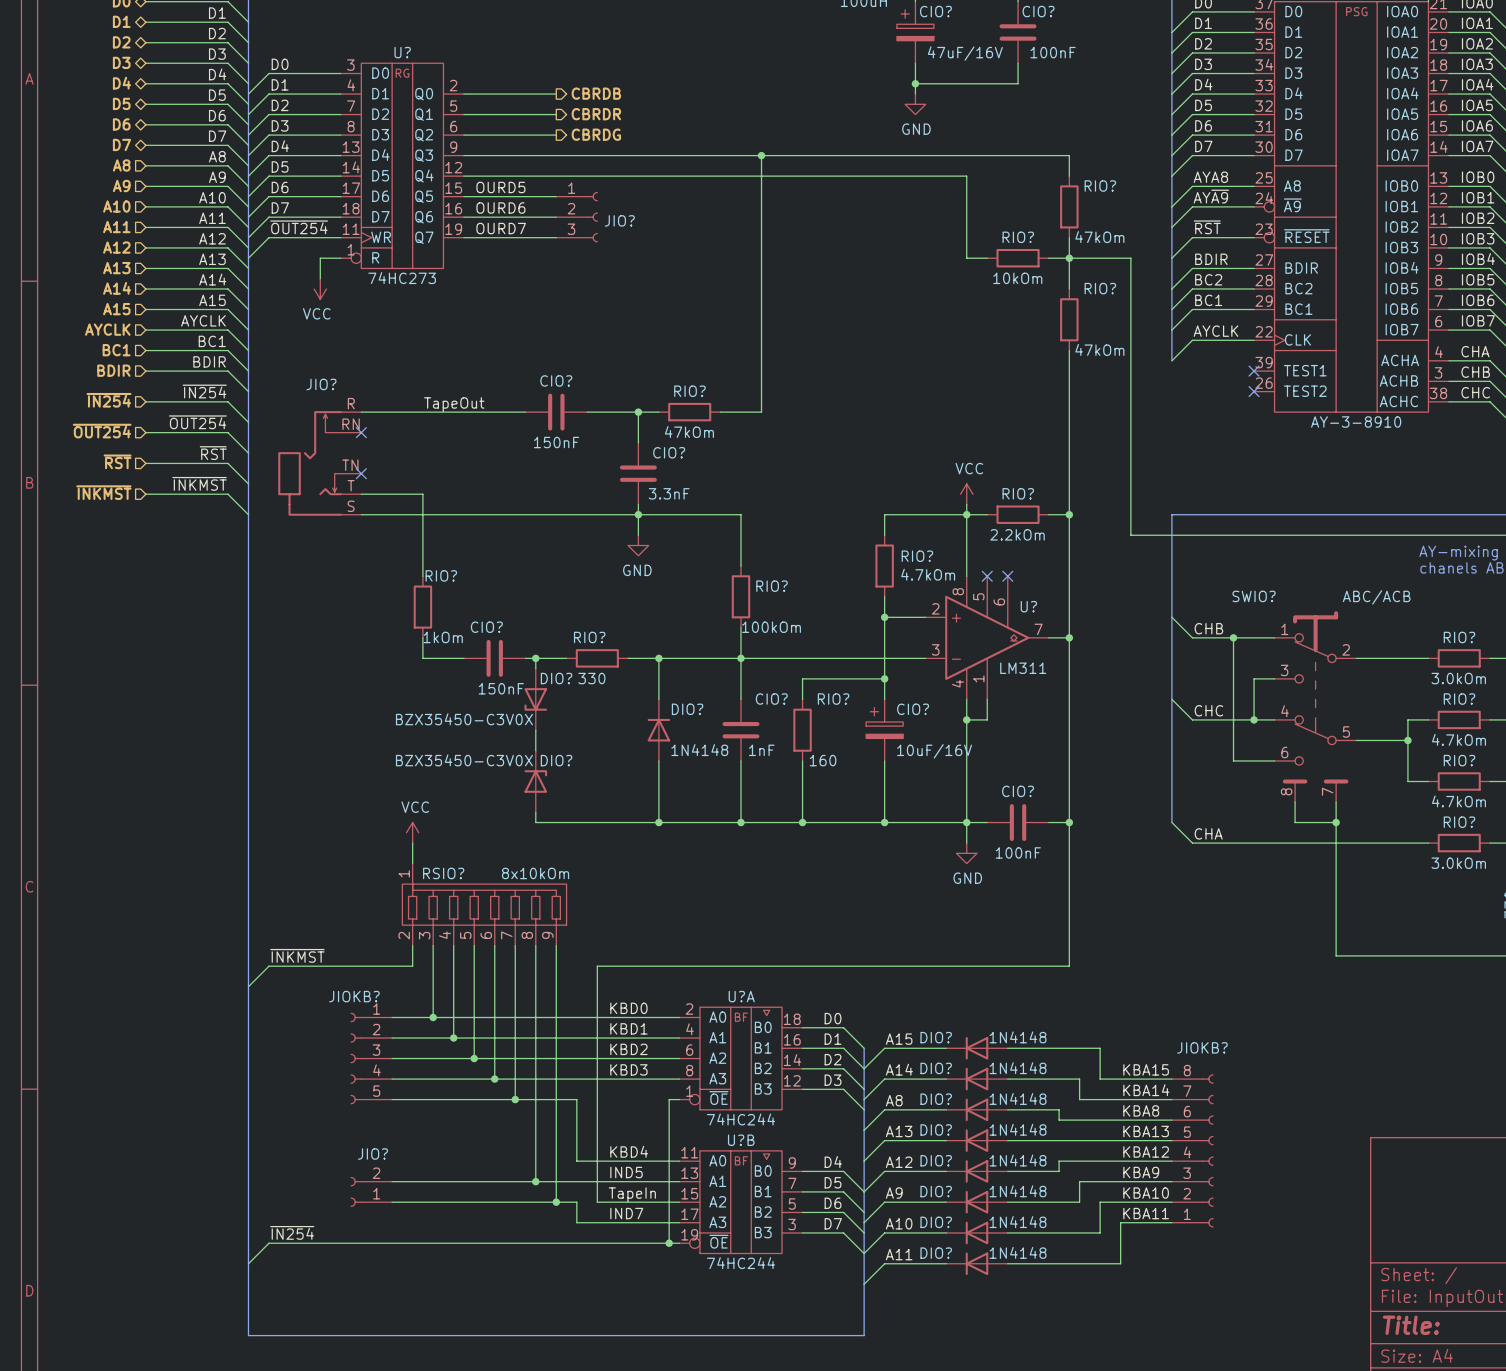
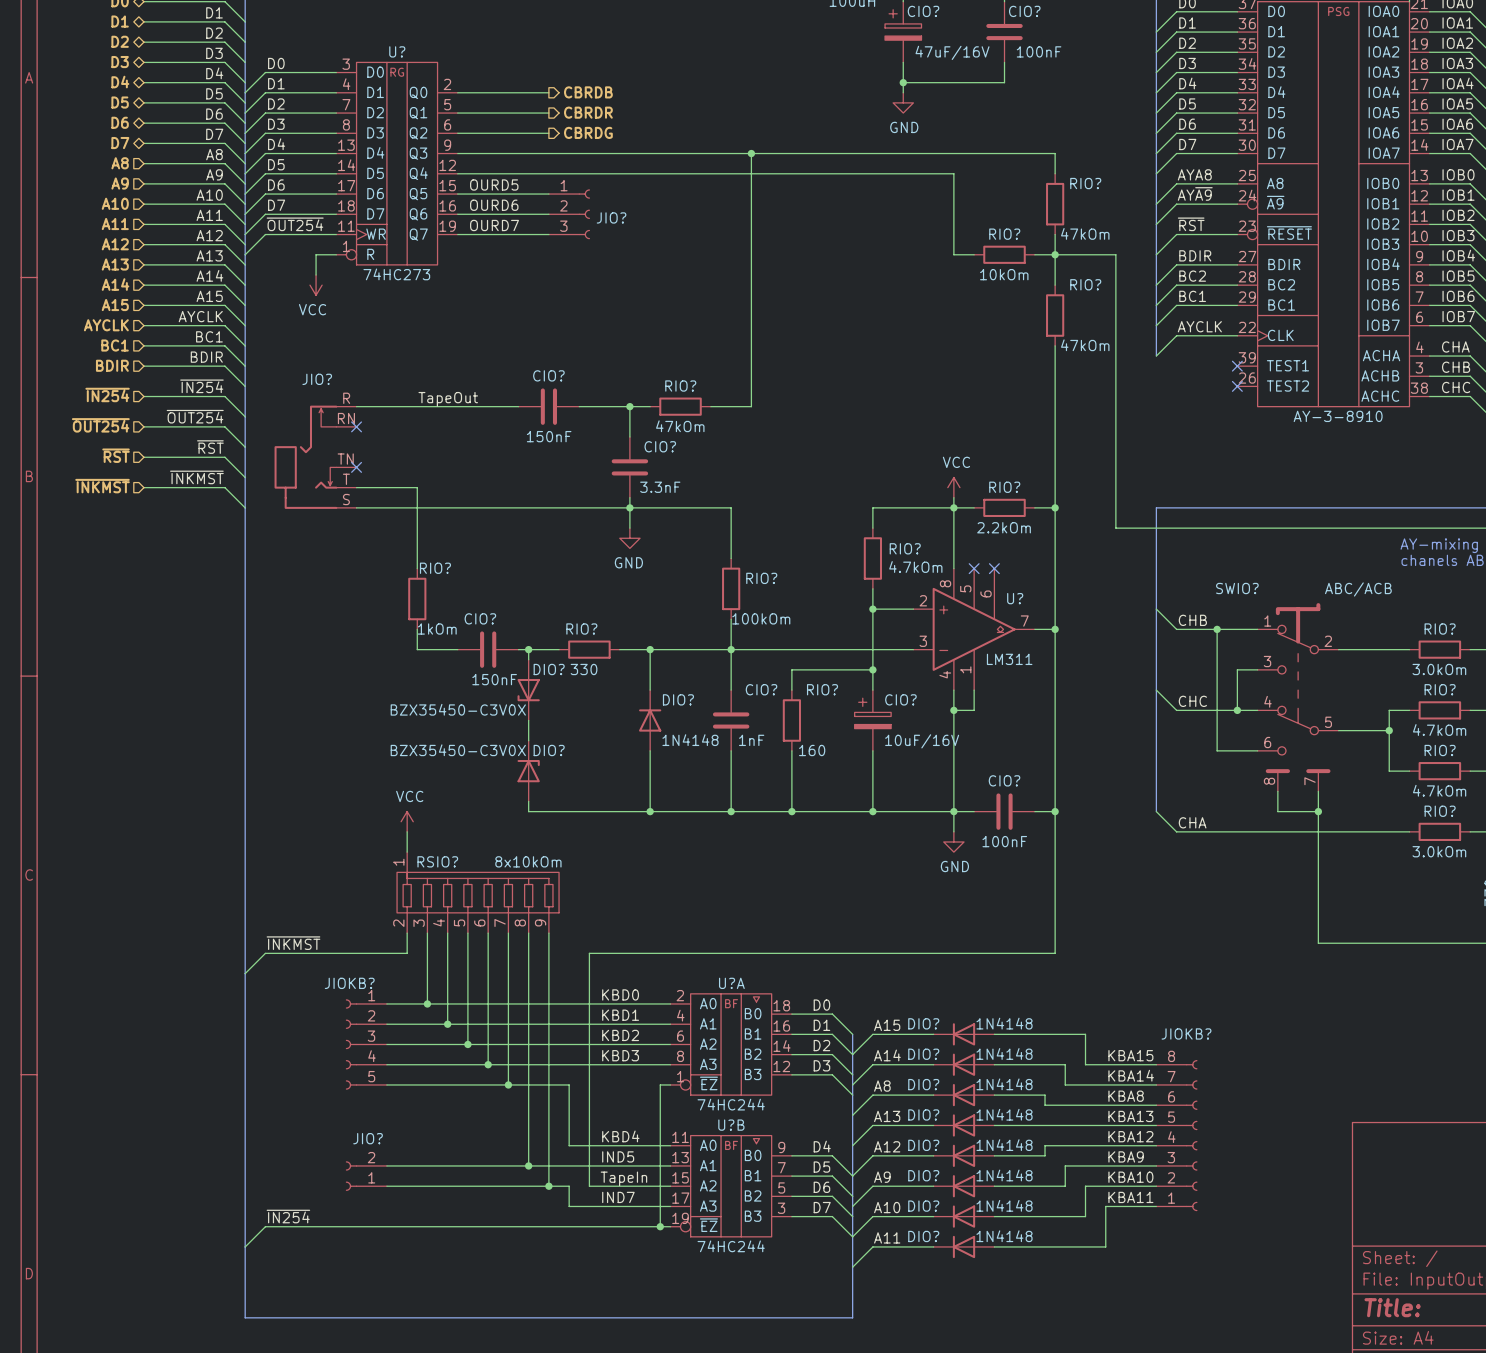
U?A pin name: ~{OE} (718, 1098) -> ~{EZ} (708, 1083)
U?B pin name: ~{OE} (718, 1241) -> ~{EZ} (708, 1225)

